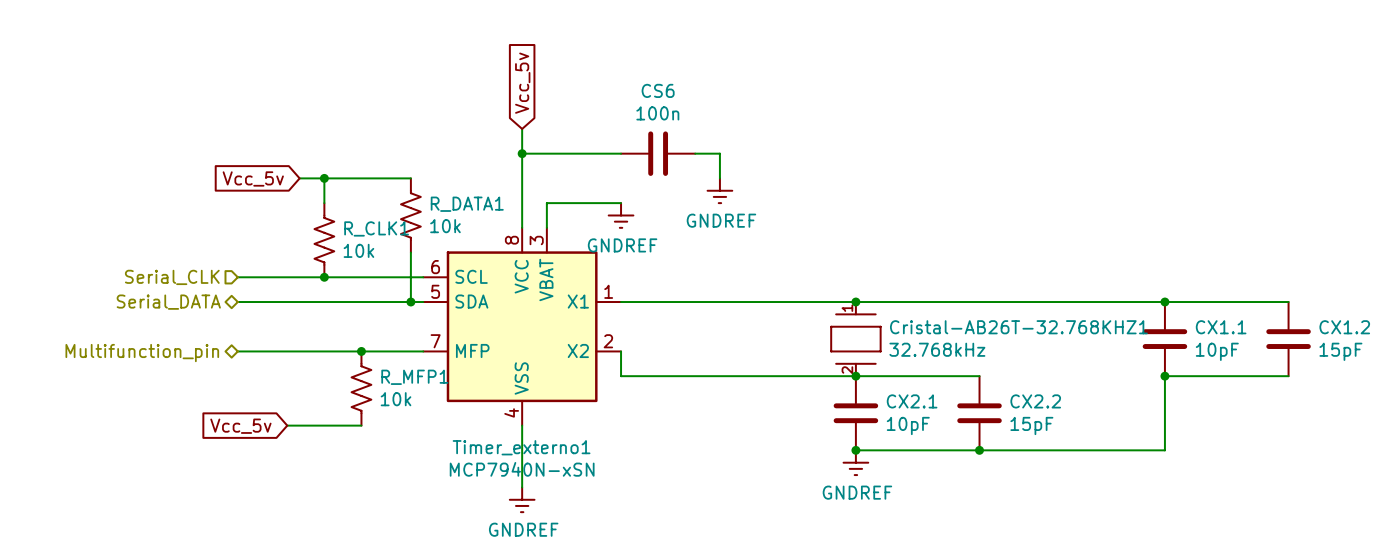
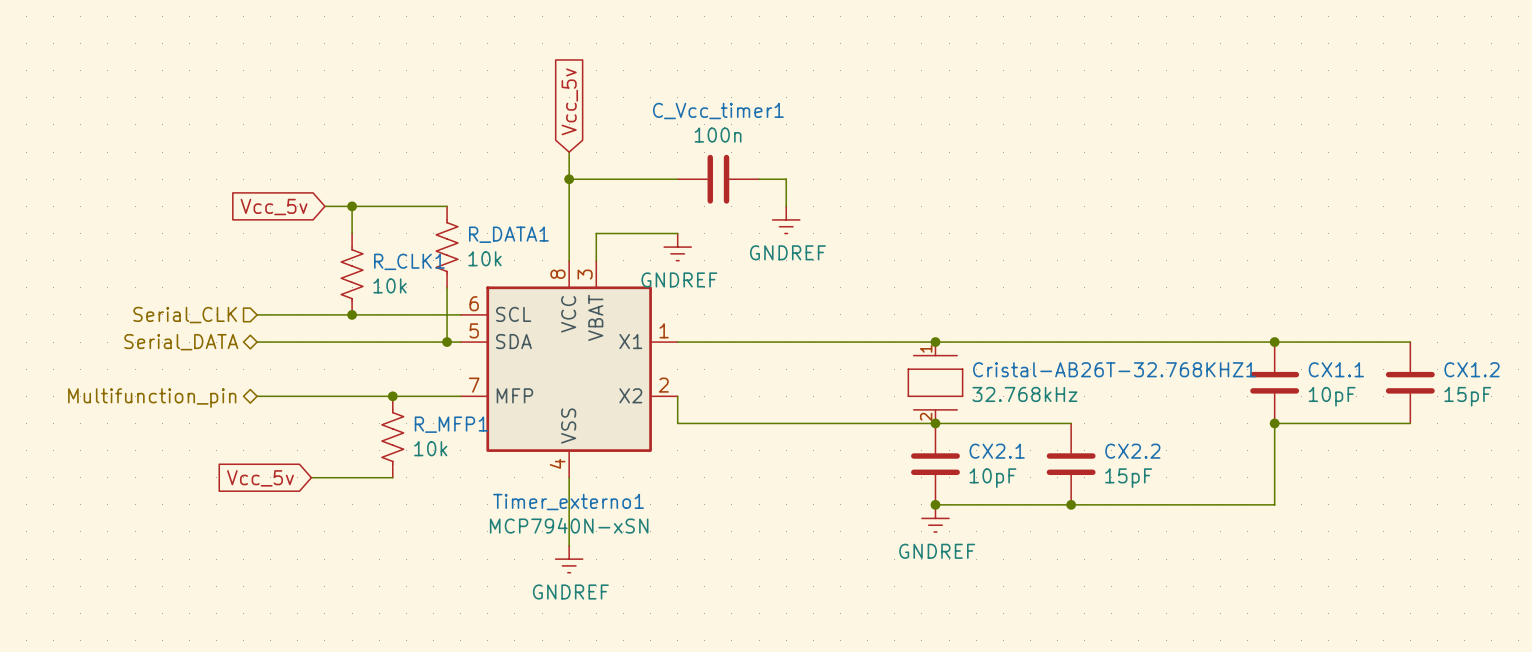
CS6 name: CS6 (658, 90) -> C_Vcc_timer1 (718, 111)

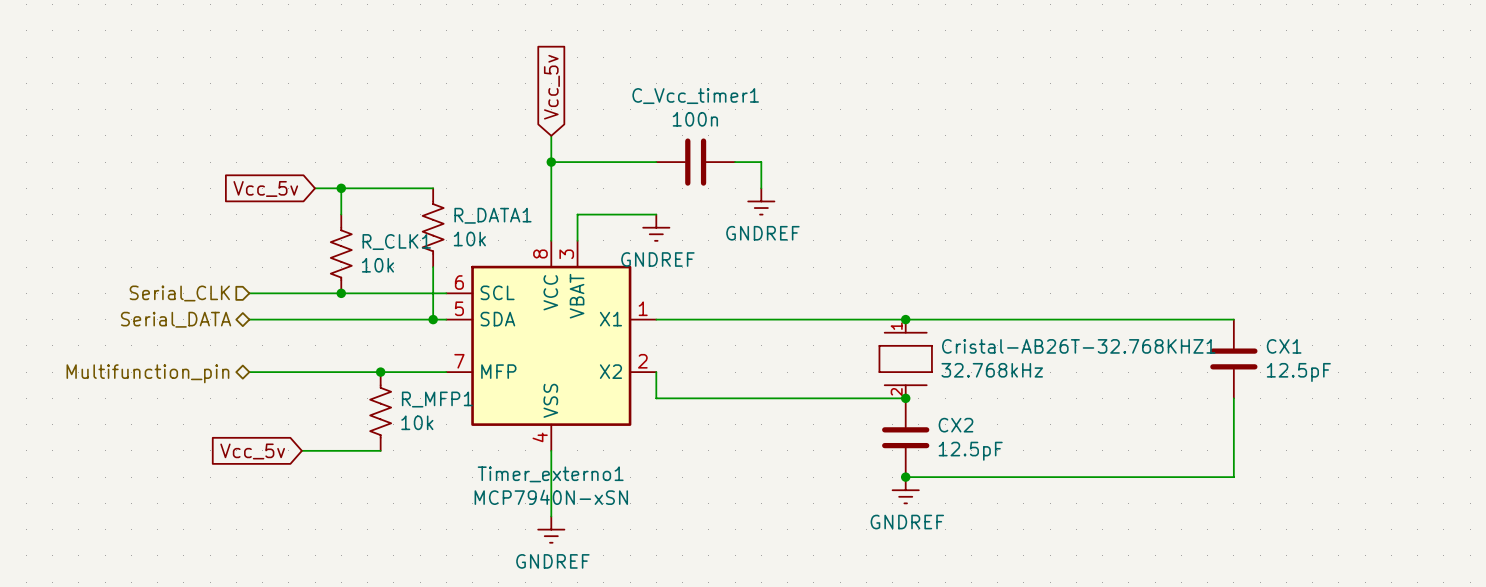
wire: (1274, 342) (1410, 342) -> none
junction: (1274, 342) -> none
CX1.1 name: CX1.1 (1336, 369) -> CX1 (1284, 346)
CX1.2: 15pF (1410, 382) -> none
CX1.1 value: 10pF (1332, 396) -> 12.5pF (1298, 372)
wire: (935, 423) (1071, 423) -> none
wire: (1274, 423) (1410, 423) -> none
junction: (1274, 423) -> none
CX2.1 name: CX2.1 (997, 451) -> CX2 (955, 425)
CX2.2: 15pF (1071, 464) -> none
CX2.1 value: 10pF (992, 478) -> 12.5pF (970, 451)
junction: (1071, 504) -> none

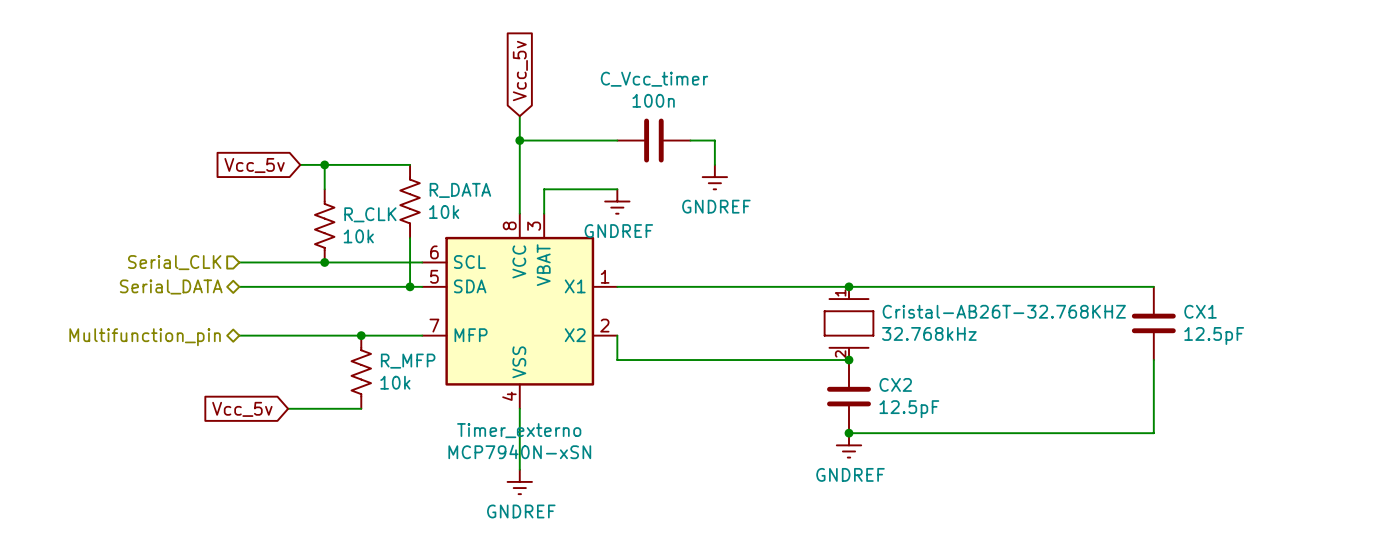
C_Vcc_timer1 name: C_Vcc_timer1 (695, 96) -> C_Vcc_timer (654, 79)
R_DATA1 name: R_DATA1 (492, 215) -> R_DATA (460, 190)
R_CLK1 name: R_CLK1 (396, 242) -> R_CLK (370, 214)
Cristal-AB26T-32.768KHZ1 name: Cristal-AB26T-32.768KHZ1 (1078, 346) -> Cristal-AB26T-32.768KHZ (1004, 311)
R_MFP1 name: R_MFP1 (437, 399) -> R_MFP (408, 361)
Timer_externo1 name: Timer_externo1 (550, 474) -> Timer_externo (519, 430)

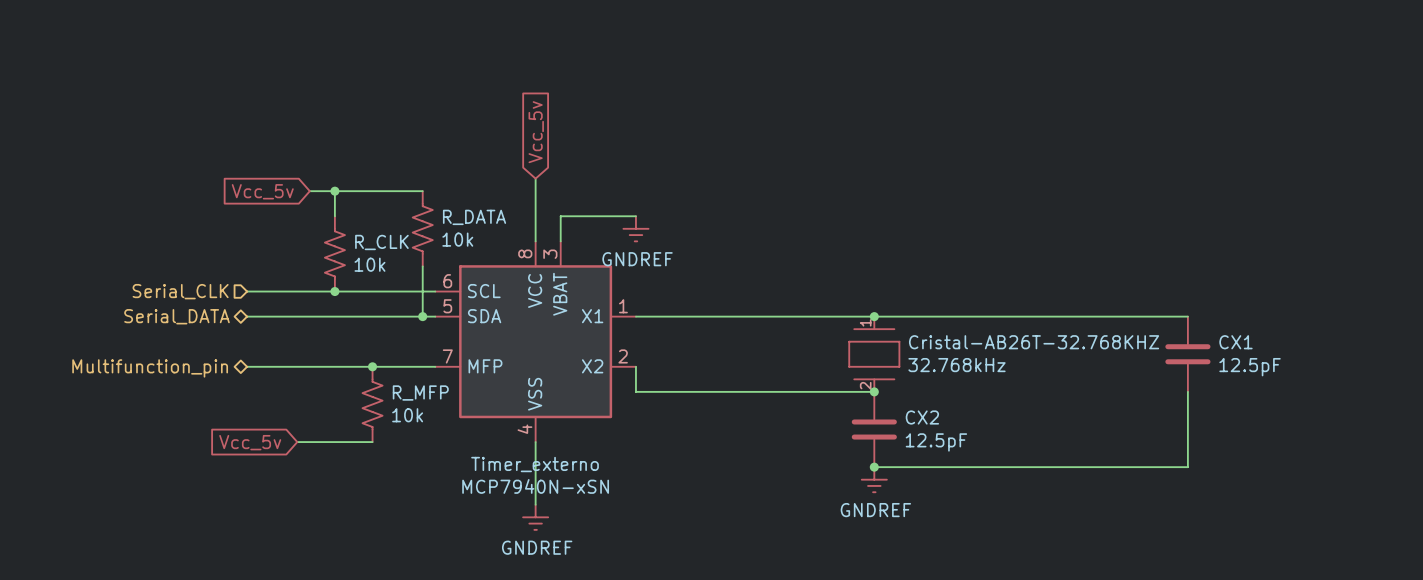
global label position: Vcc_5v (520, 70) -> Vcc_5v (536, 132)
wire: (519, 116) (519, 152) -> none
wire: (519, 140) (617, 140) -> none
junction: (519, 140) -> none
C_Vcc_timer: 100n (653, 140) -> none
wire: (690, 140) (714, 140) (714, 164) -> none
power symbol: GNDREF (714, 177) -> none

